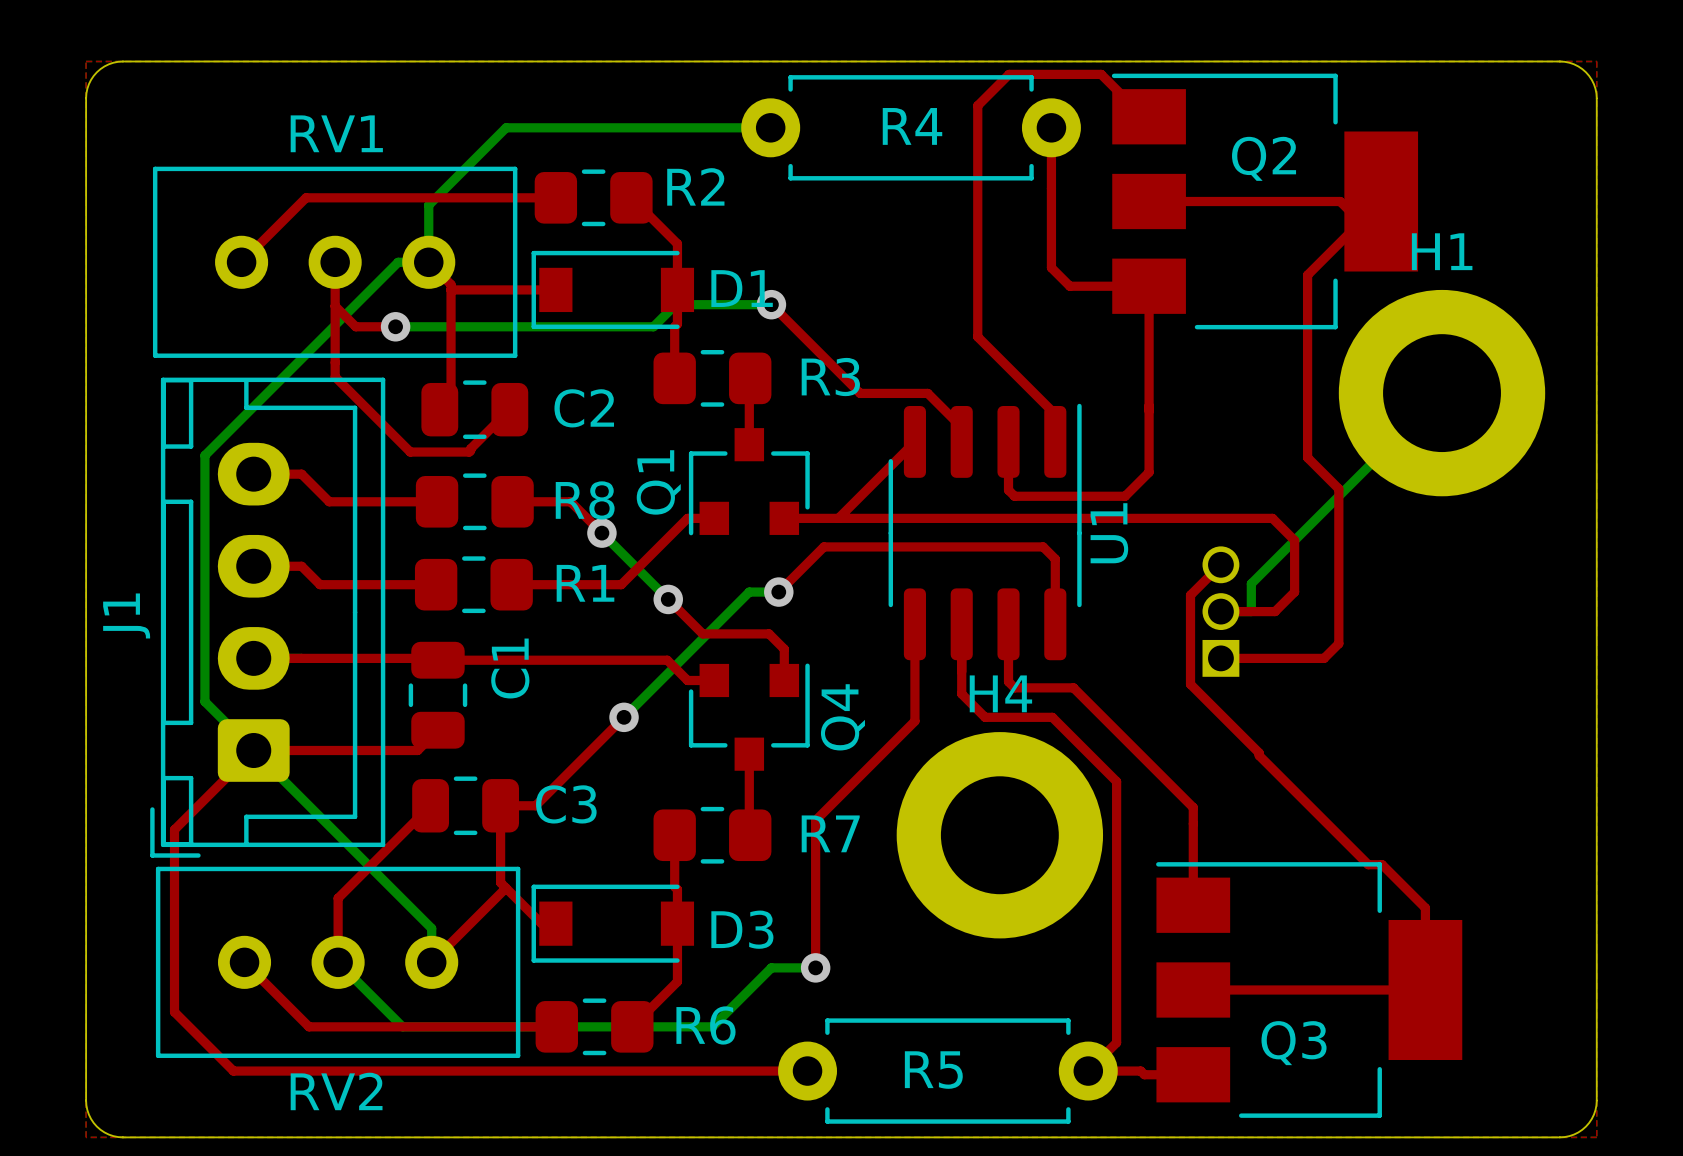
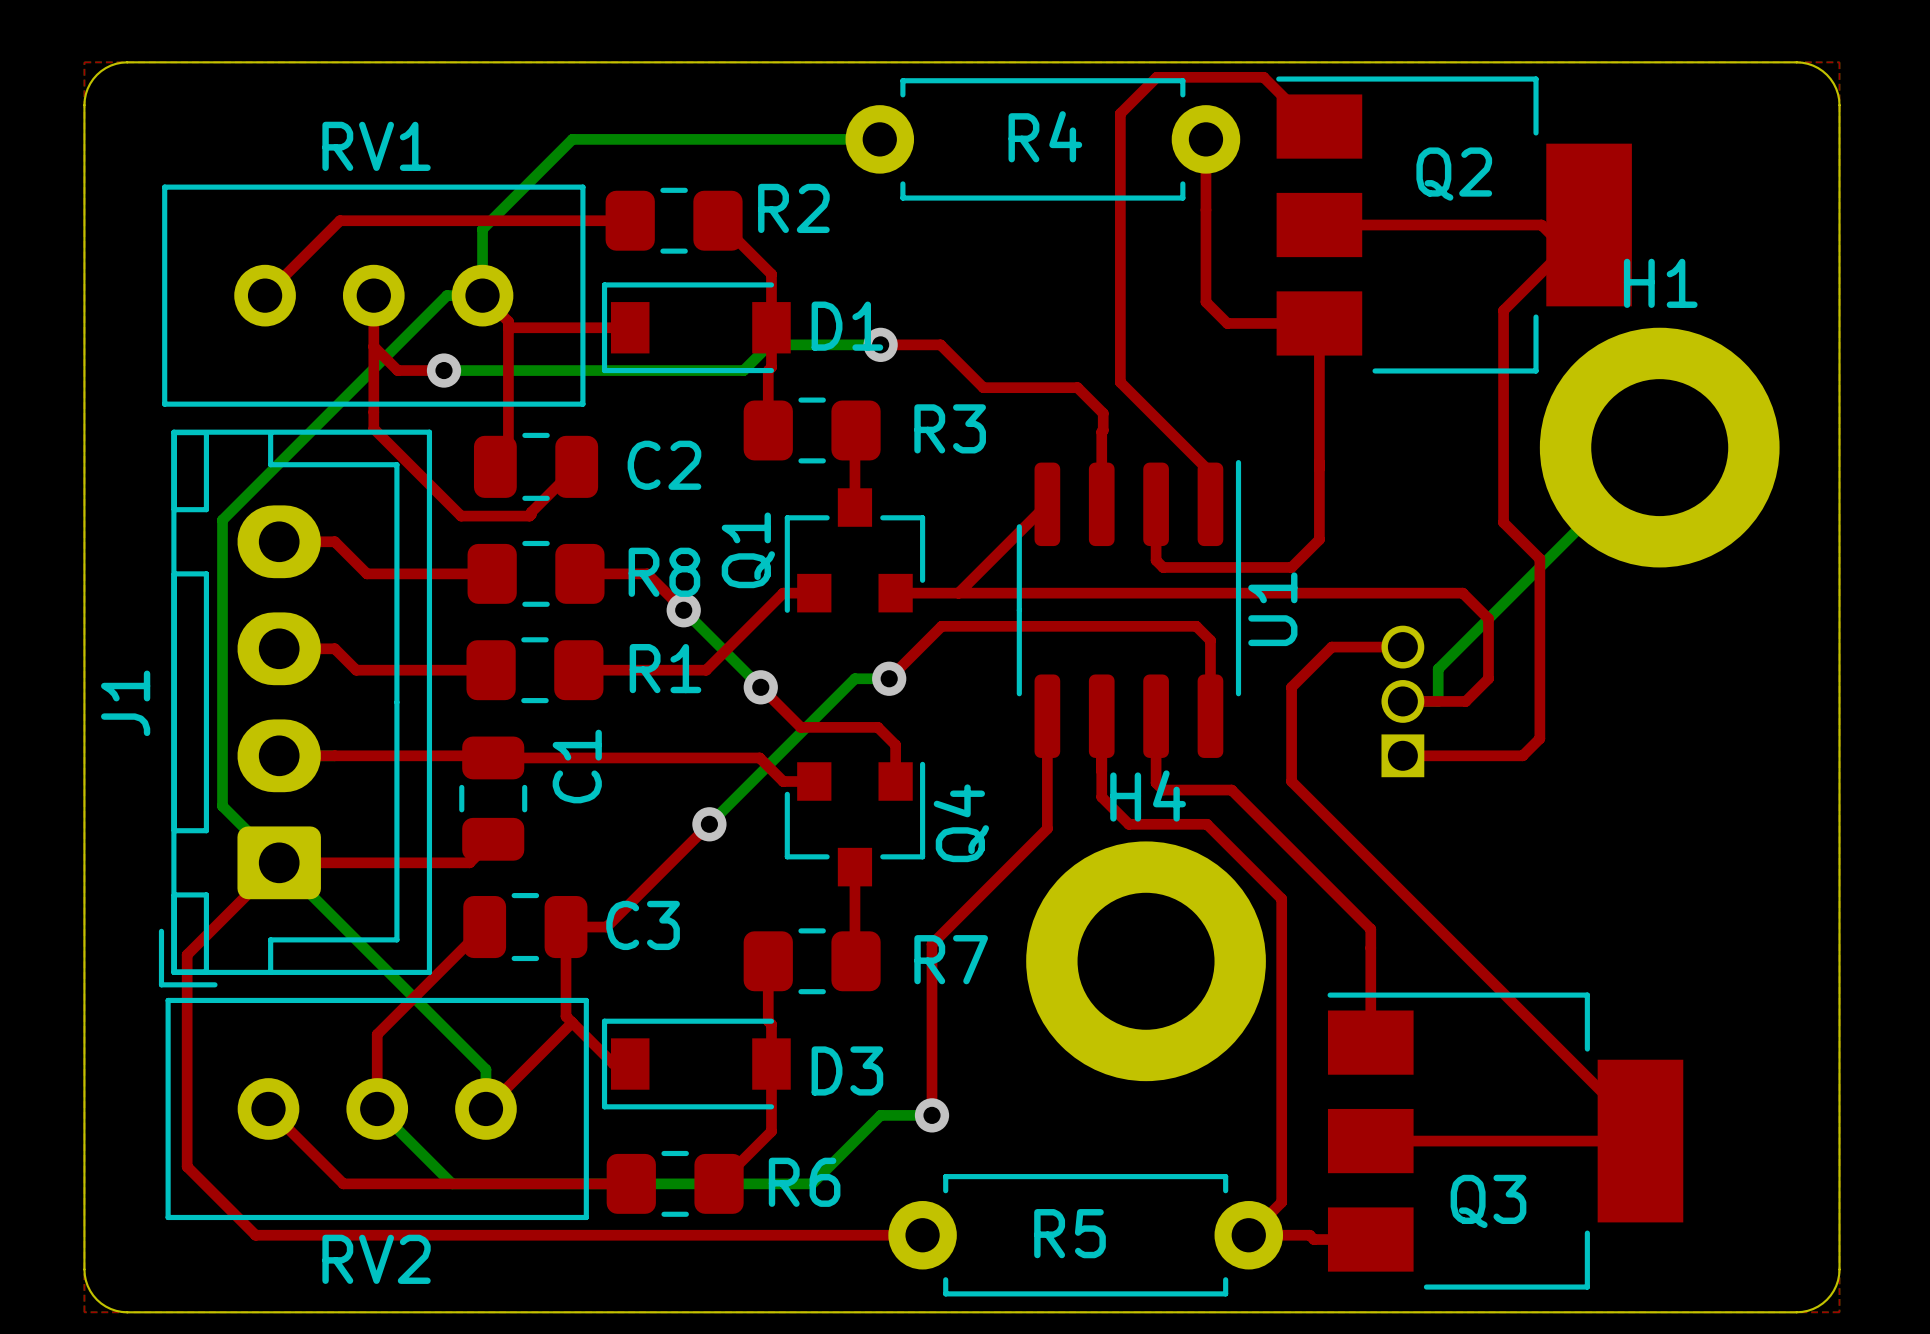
top track: (771, 304) (860, 393) (927, 393) (961, 427) -> (880, 344) (940, 344) (983, 387) (1077, 387) (1103, 413) (1101, 487)
top track: (1220, 564) (1190, 595) (1190, 684) (1368, 864) (1382, 864) (1425, 908) (1425, 980) -> (1402, 647) (1331, 647) (1291, 687) (1291, 781) (1640, 1130)

